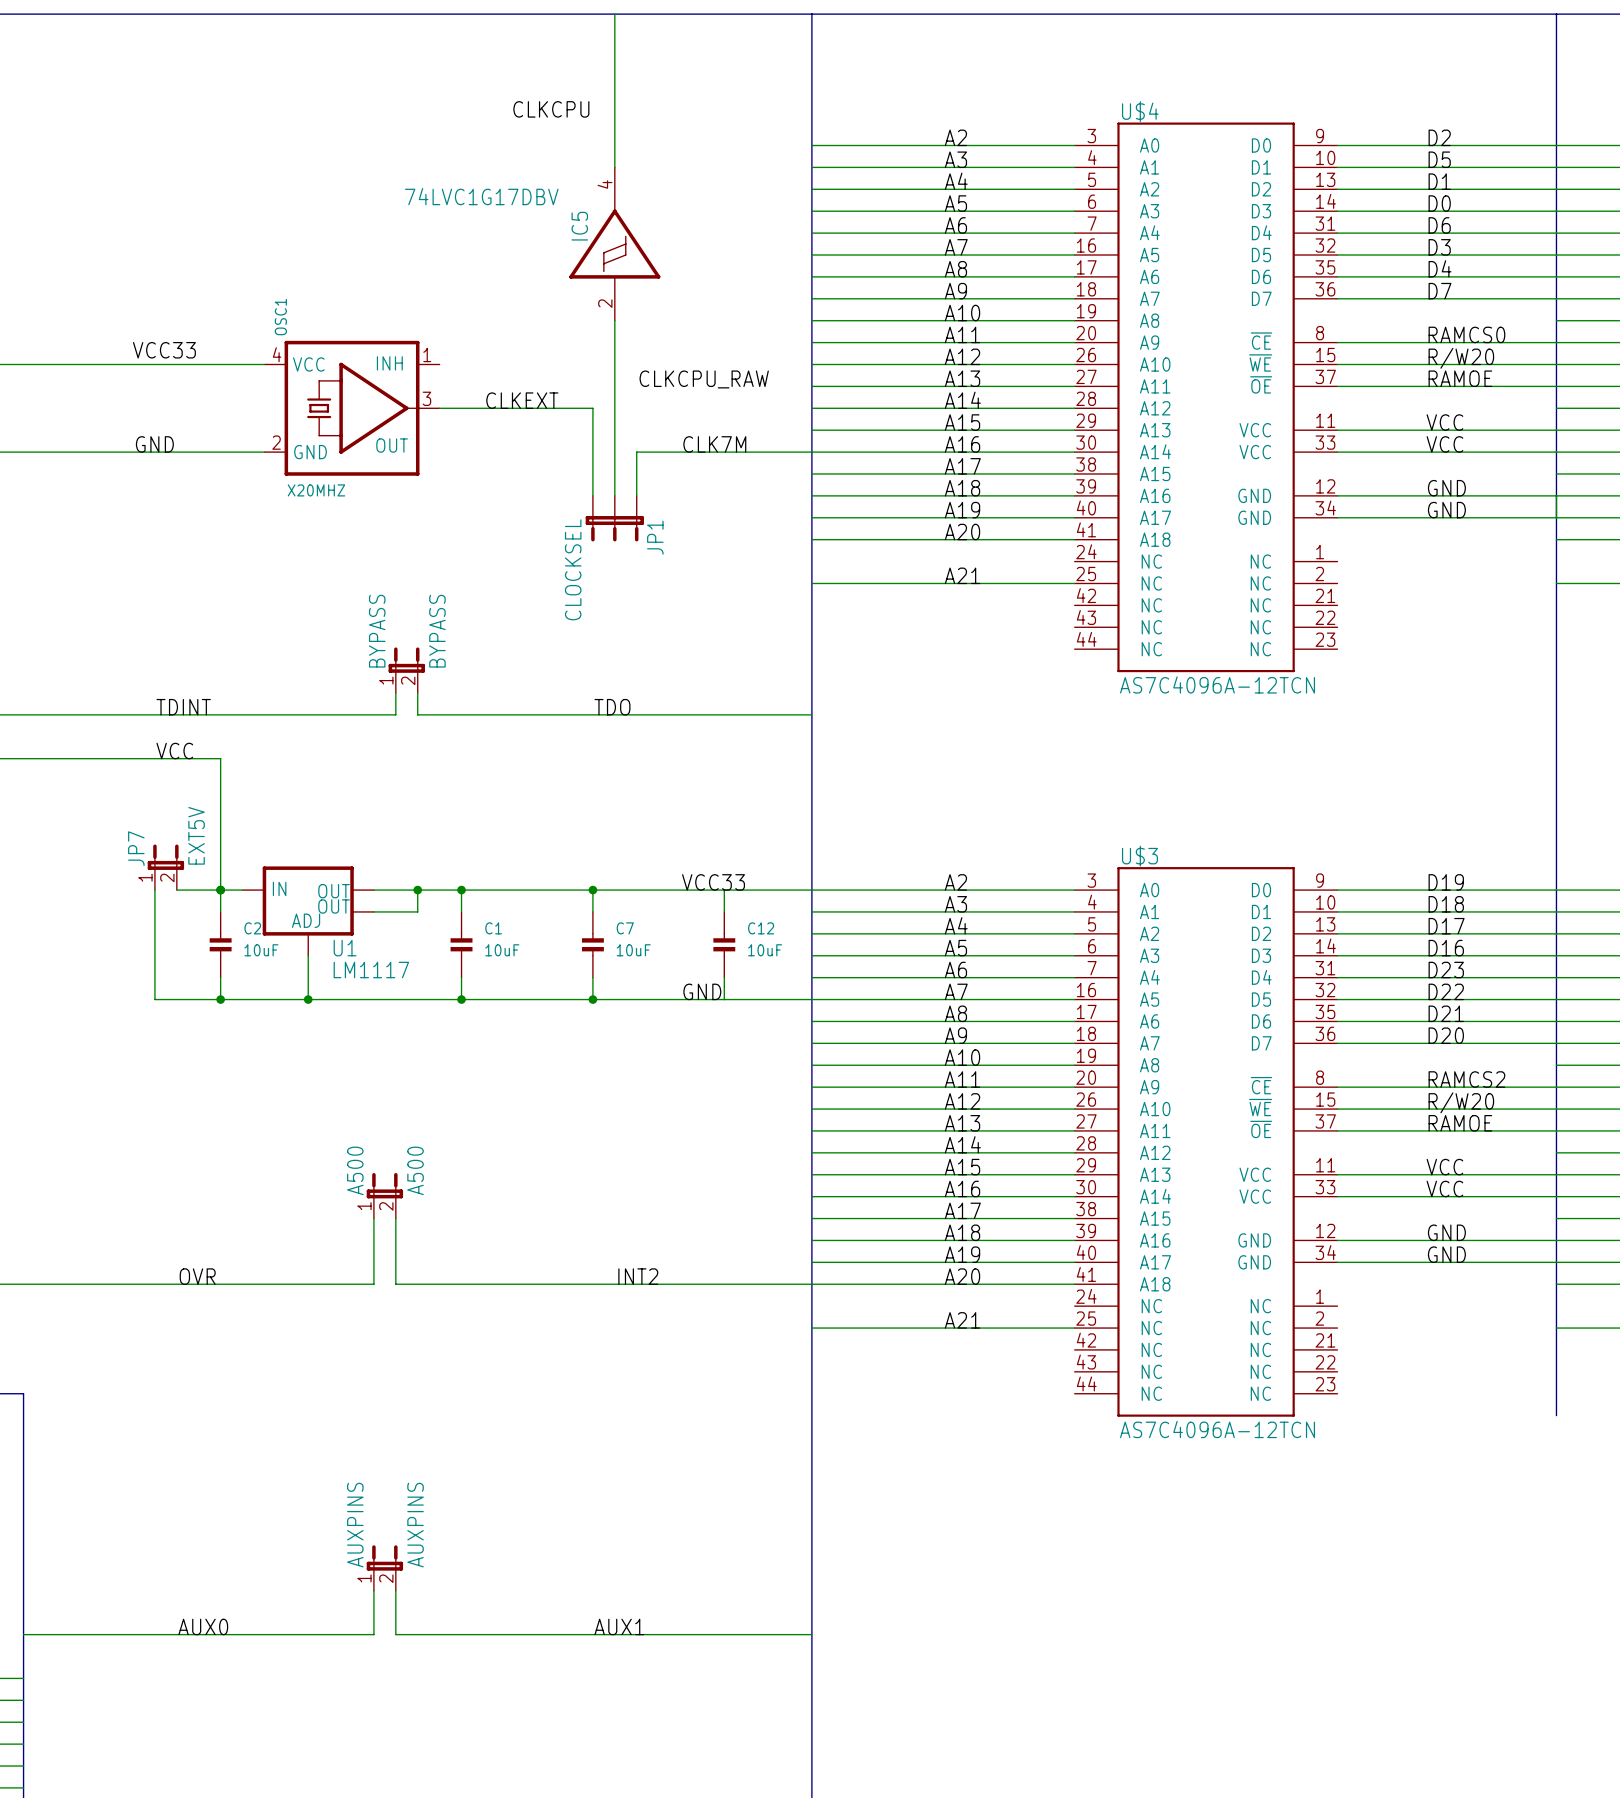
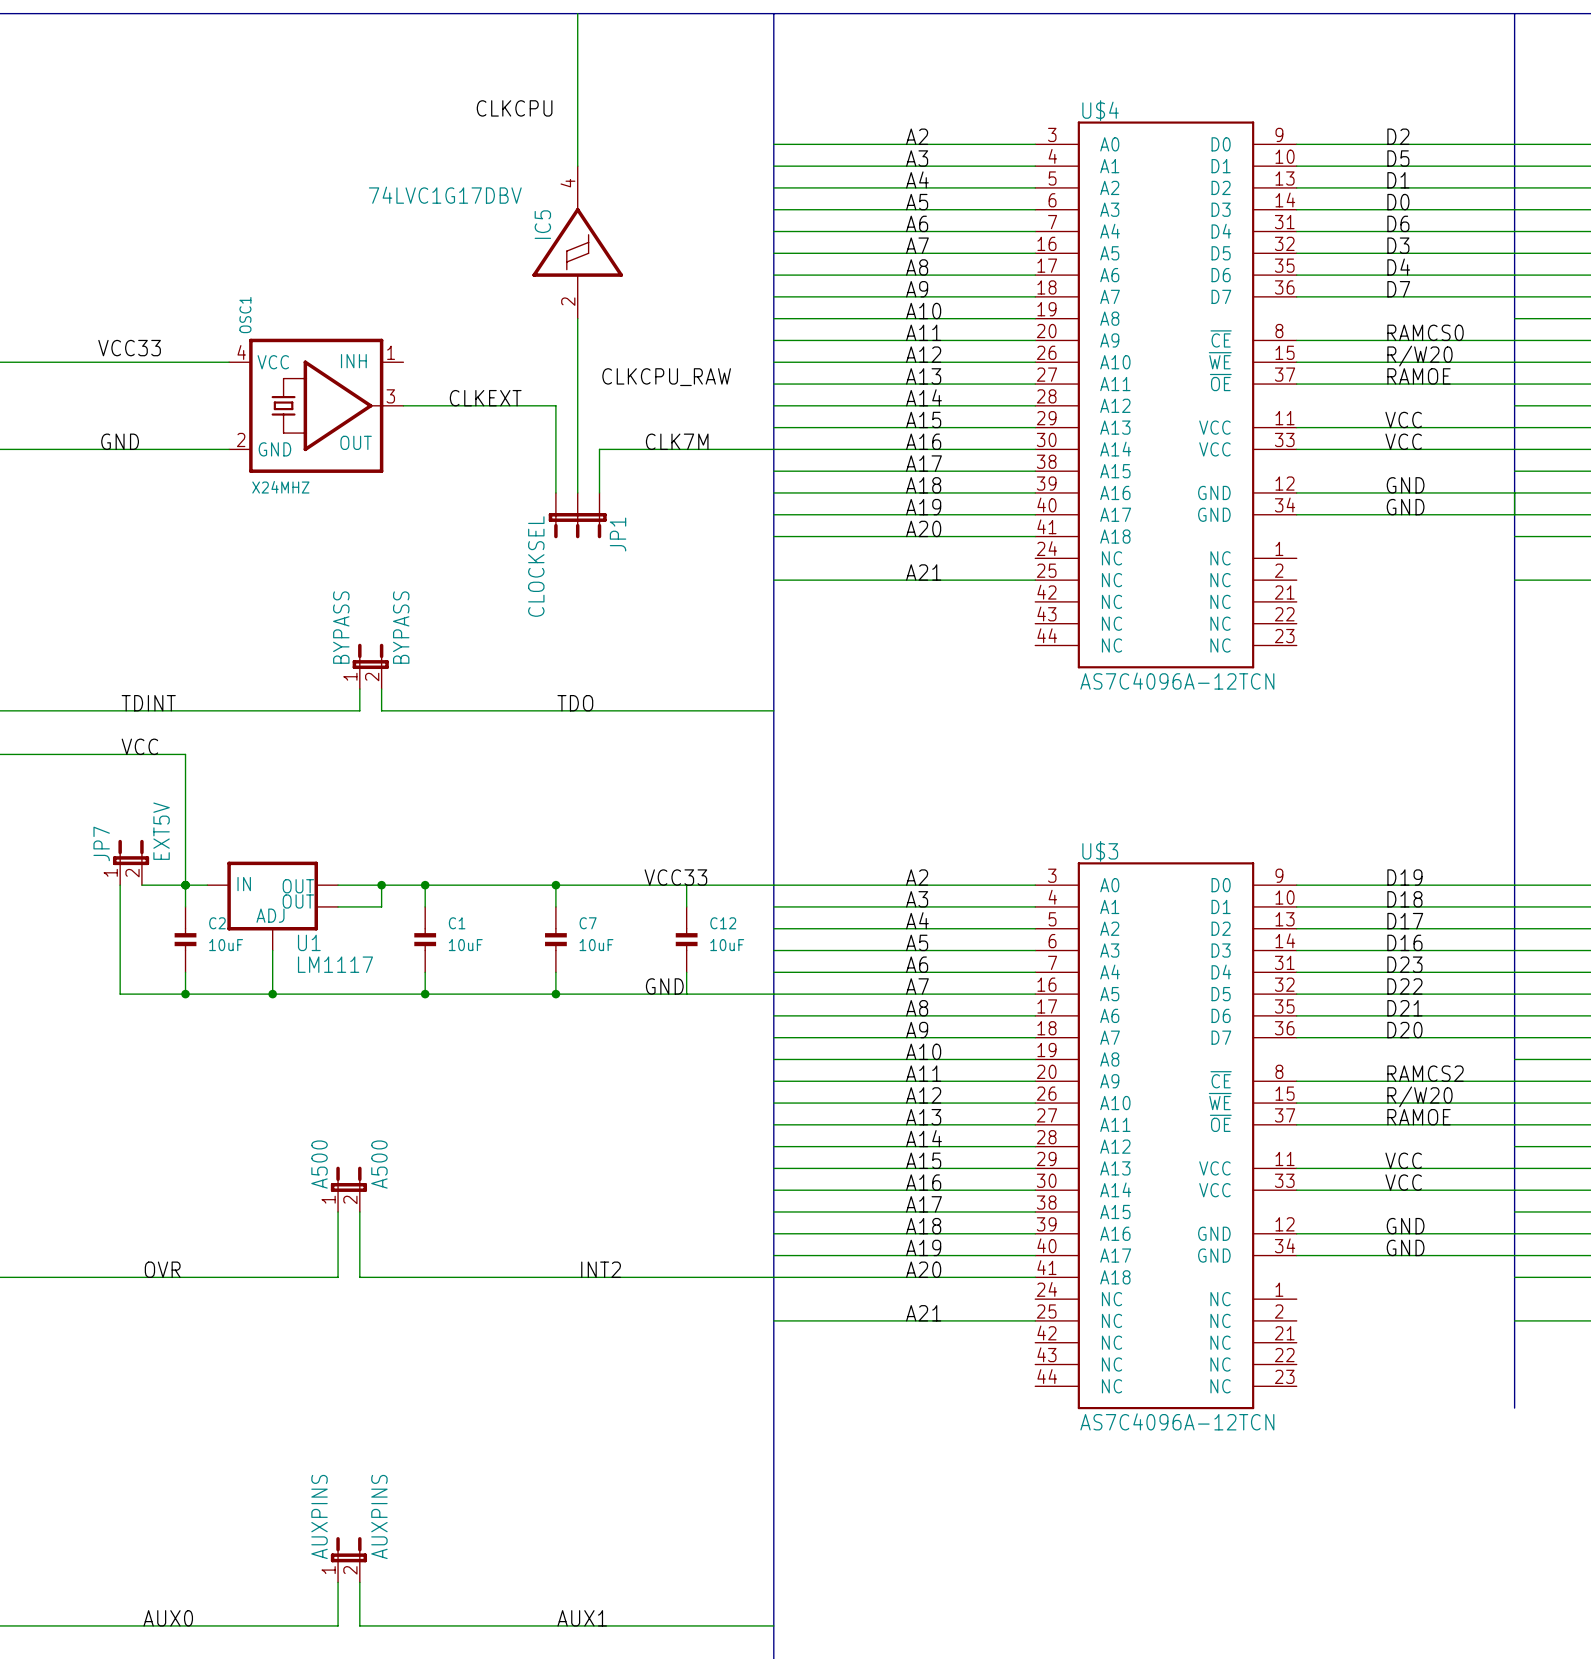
OSC1 value: X20MHZ (316, 490) -> X24MHZ (280, 487)

